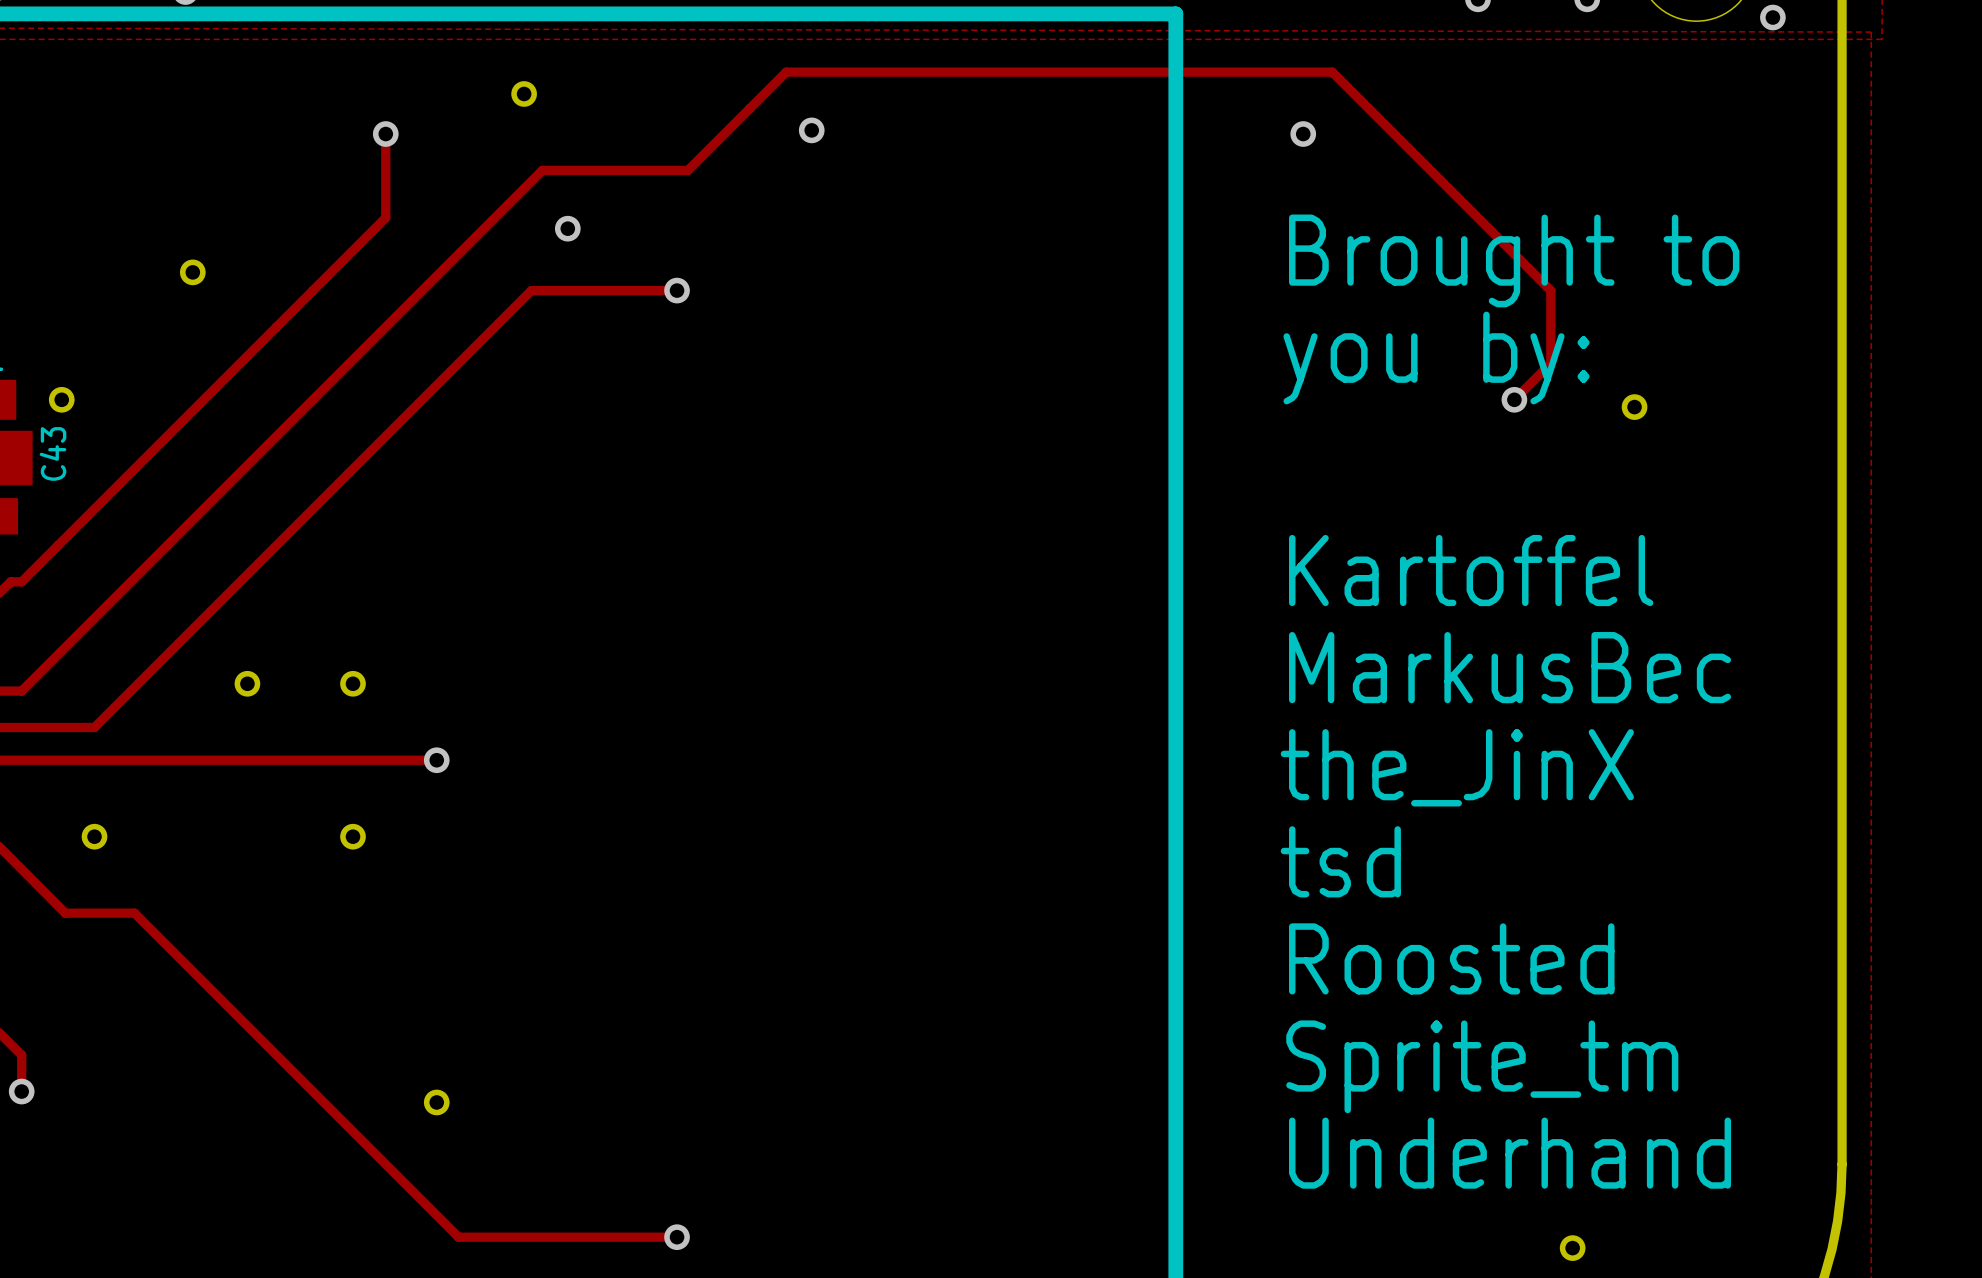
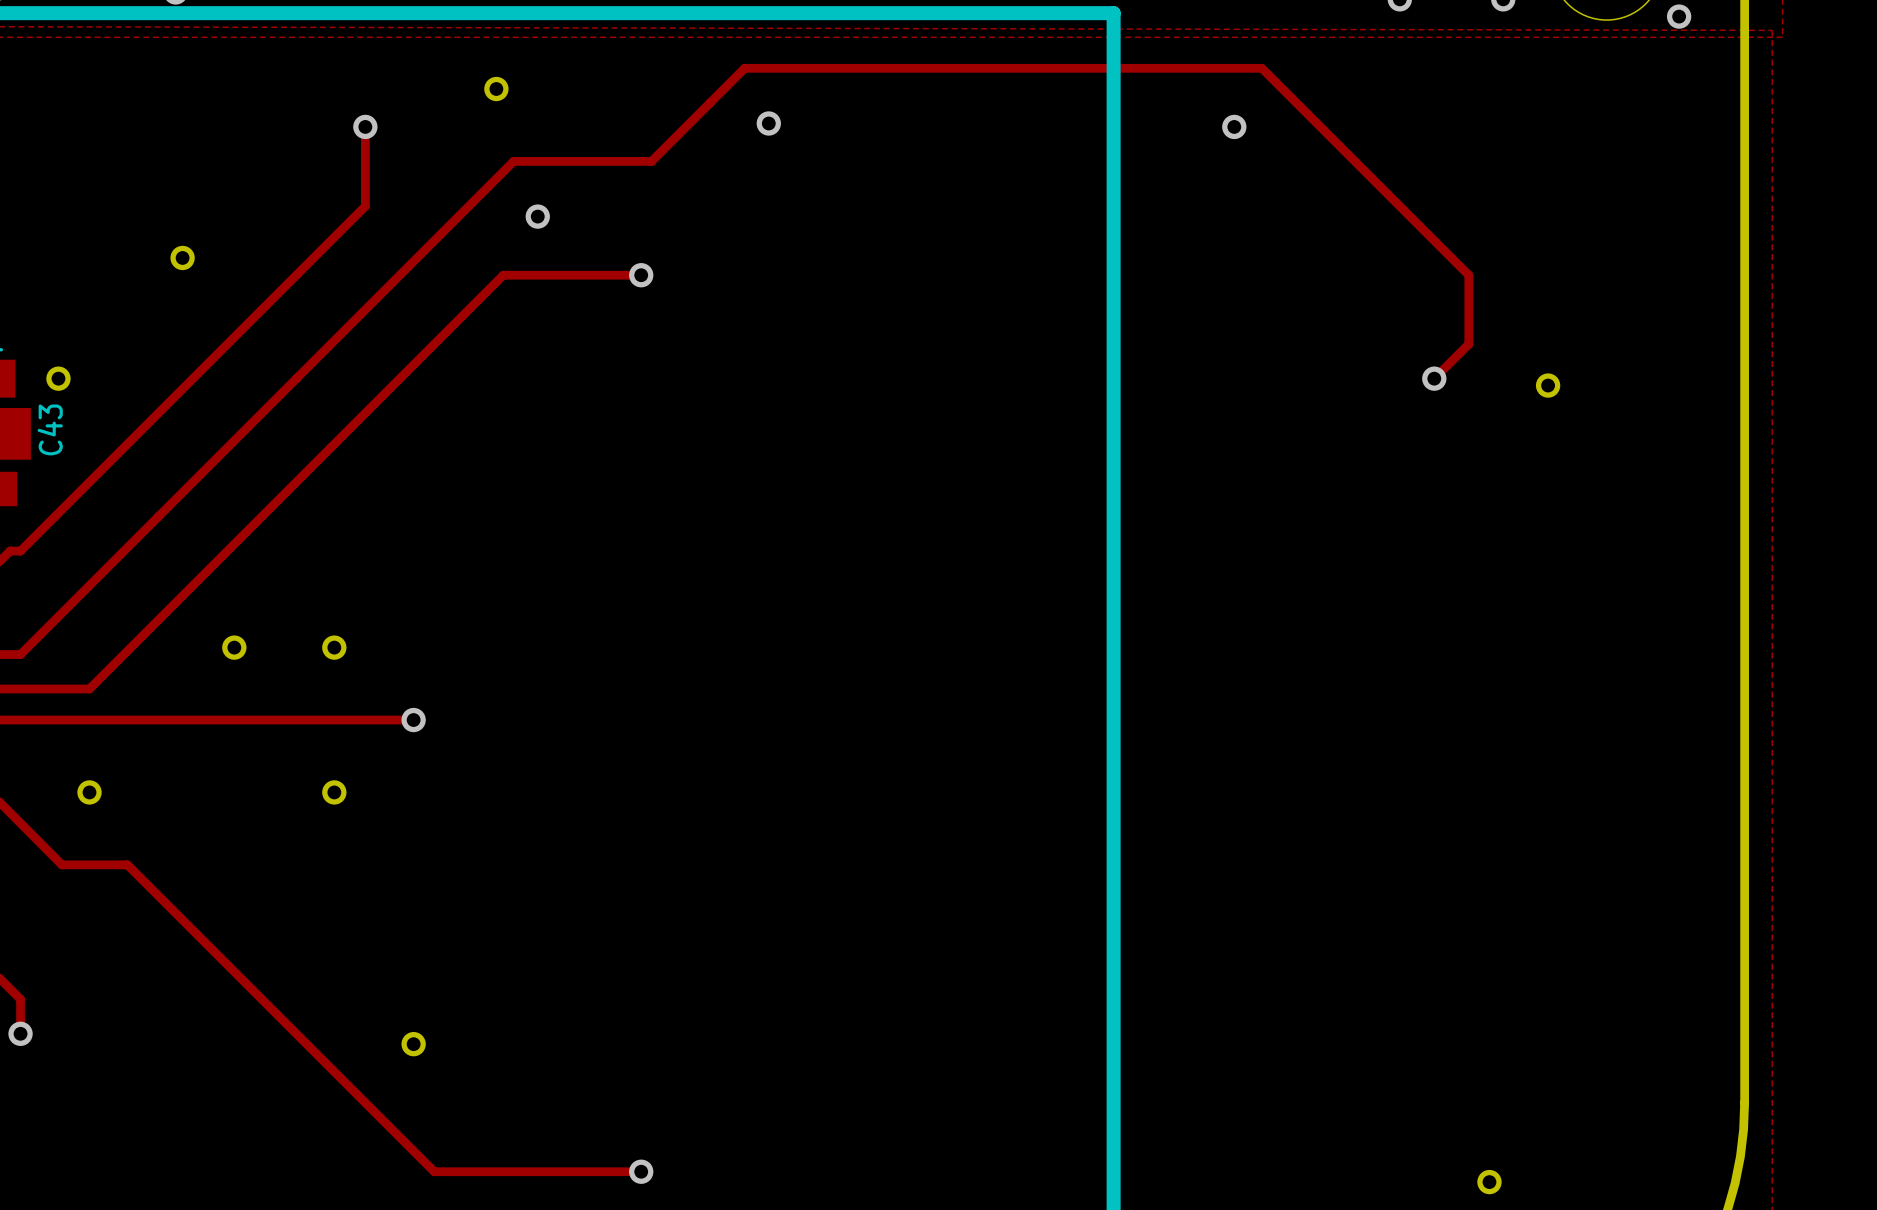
text: Brought to (1514, 260) -> none
text: you by: (1436, 358) -> none
text: Kartoffel (1471, 570) -> none
text: MarkusBec (1510, 667) -> none
text: the_JinX (1457, 767) -> none
text: tsd (1340, 861) -> none
text: Roosted (1451, 958) -> none
text: Sprite_tm (1482, 1066) -> none
text: Underhand (1510, 1153) -> none

